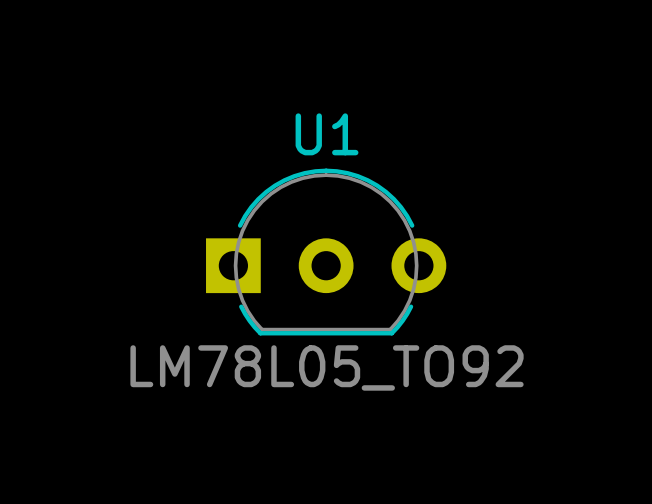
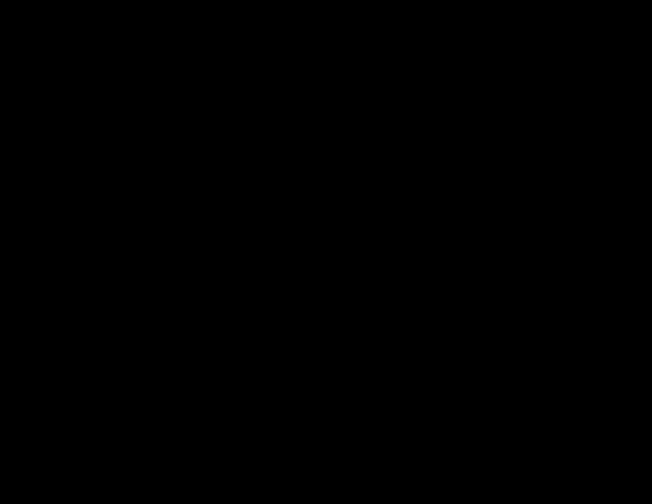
U1: LM78L05_TO92 (326, 252) -> none

